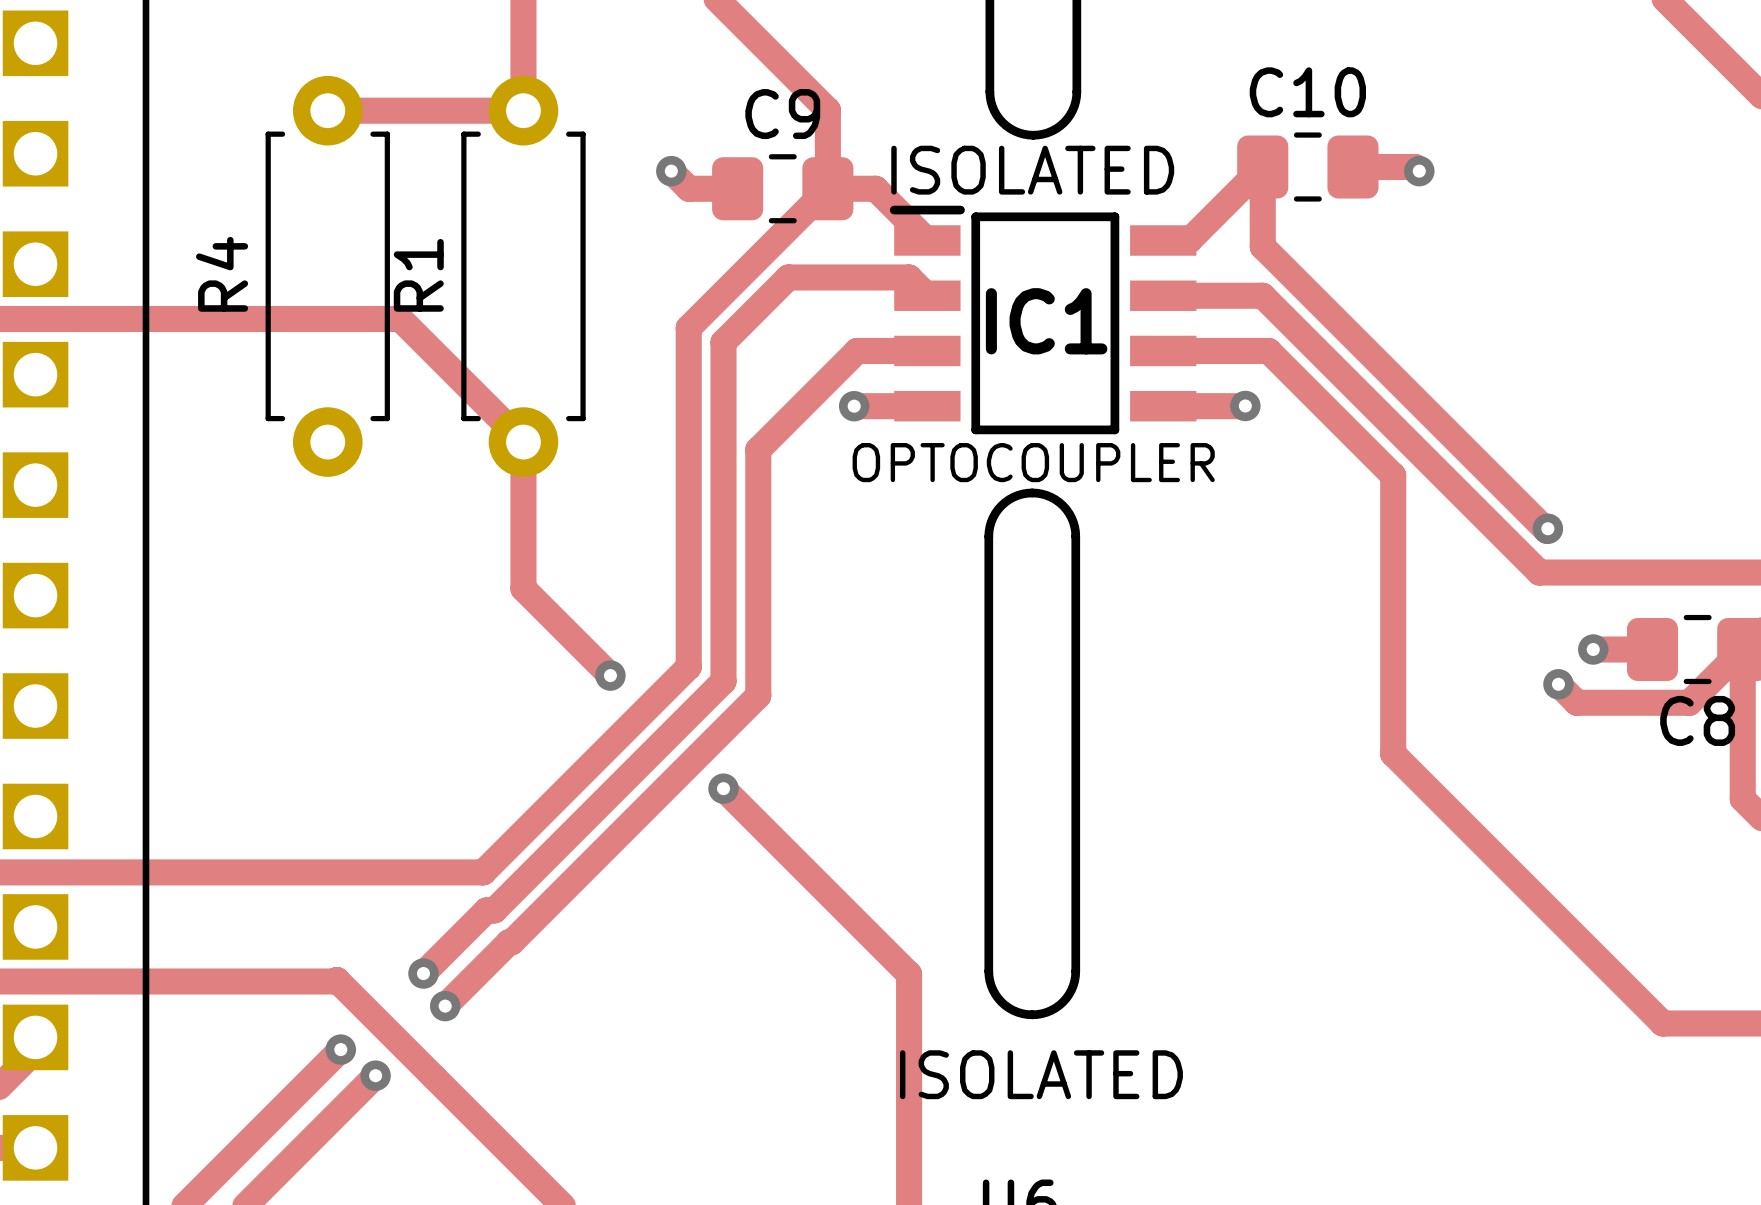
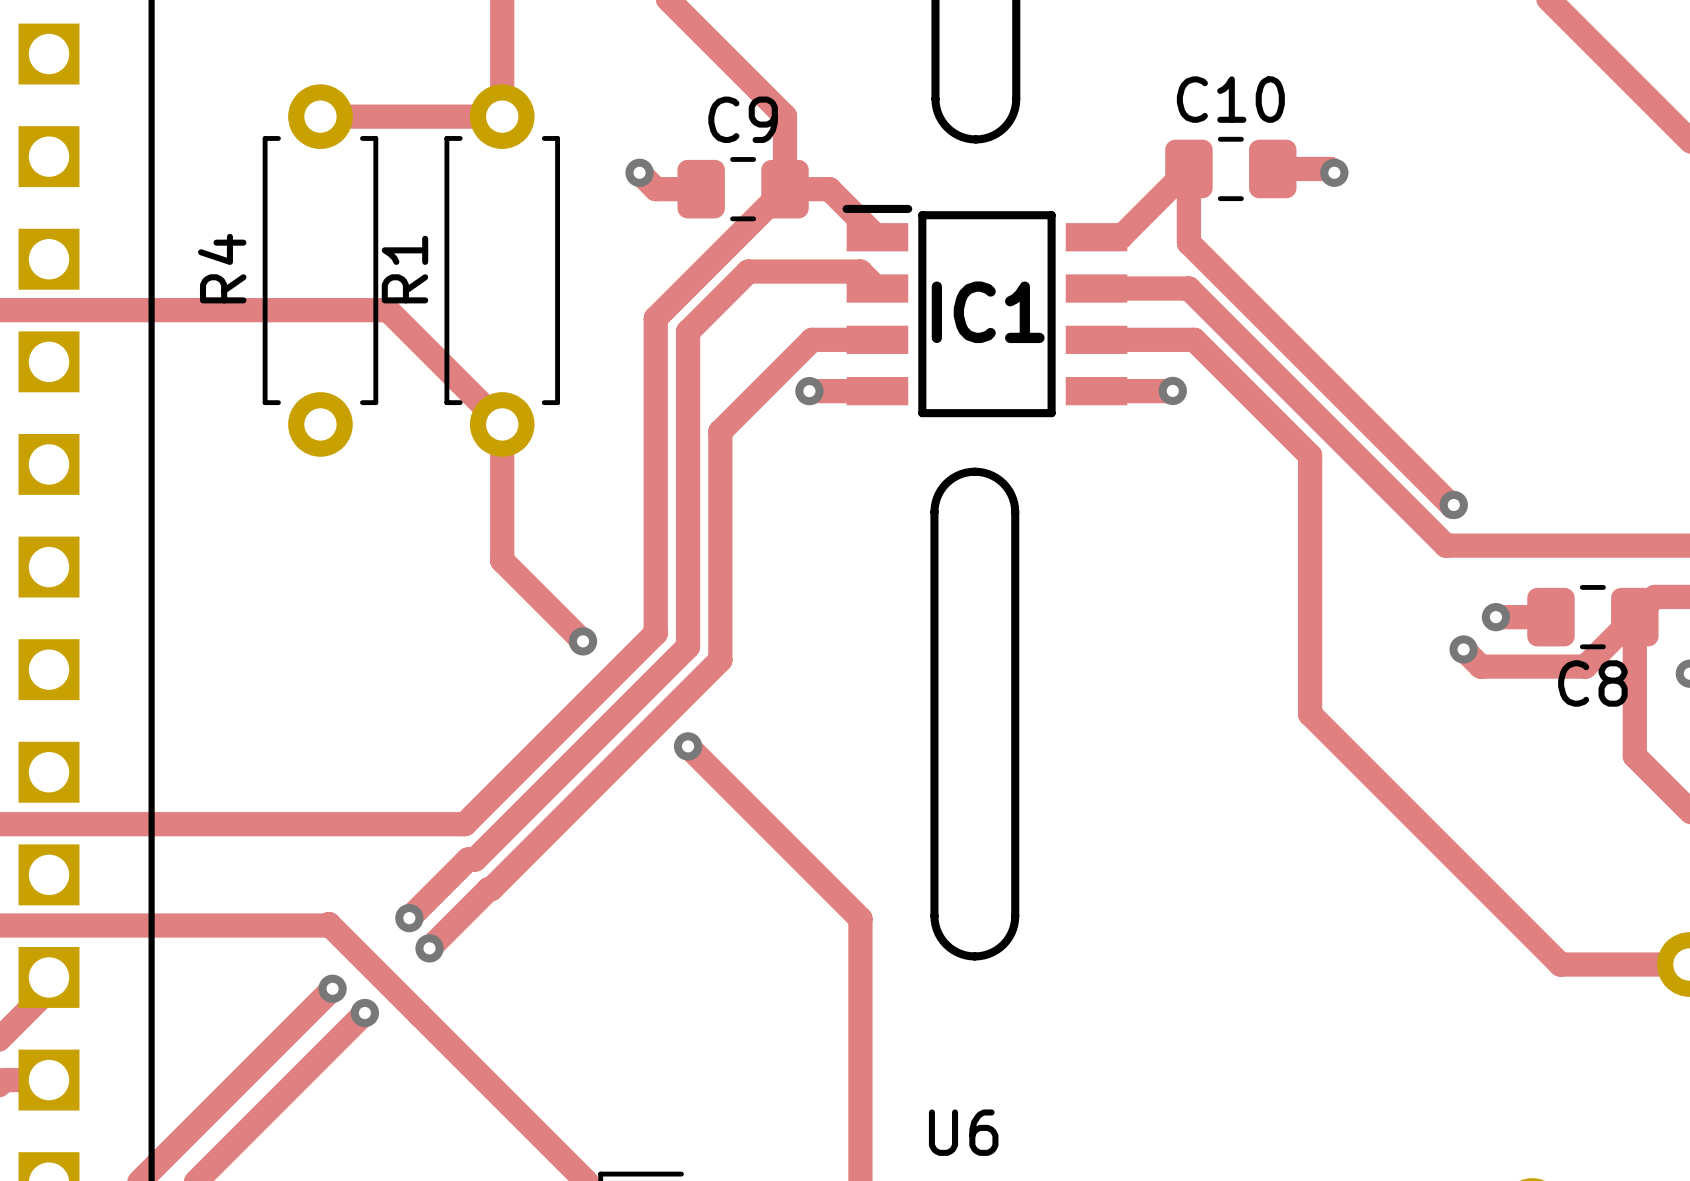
text: ISOLATED (1032, 170) -> none
text: OPTOCOUPLER (1033, 462) -> none
text: ISOLATED (1041, 1074) -> none

